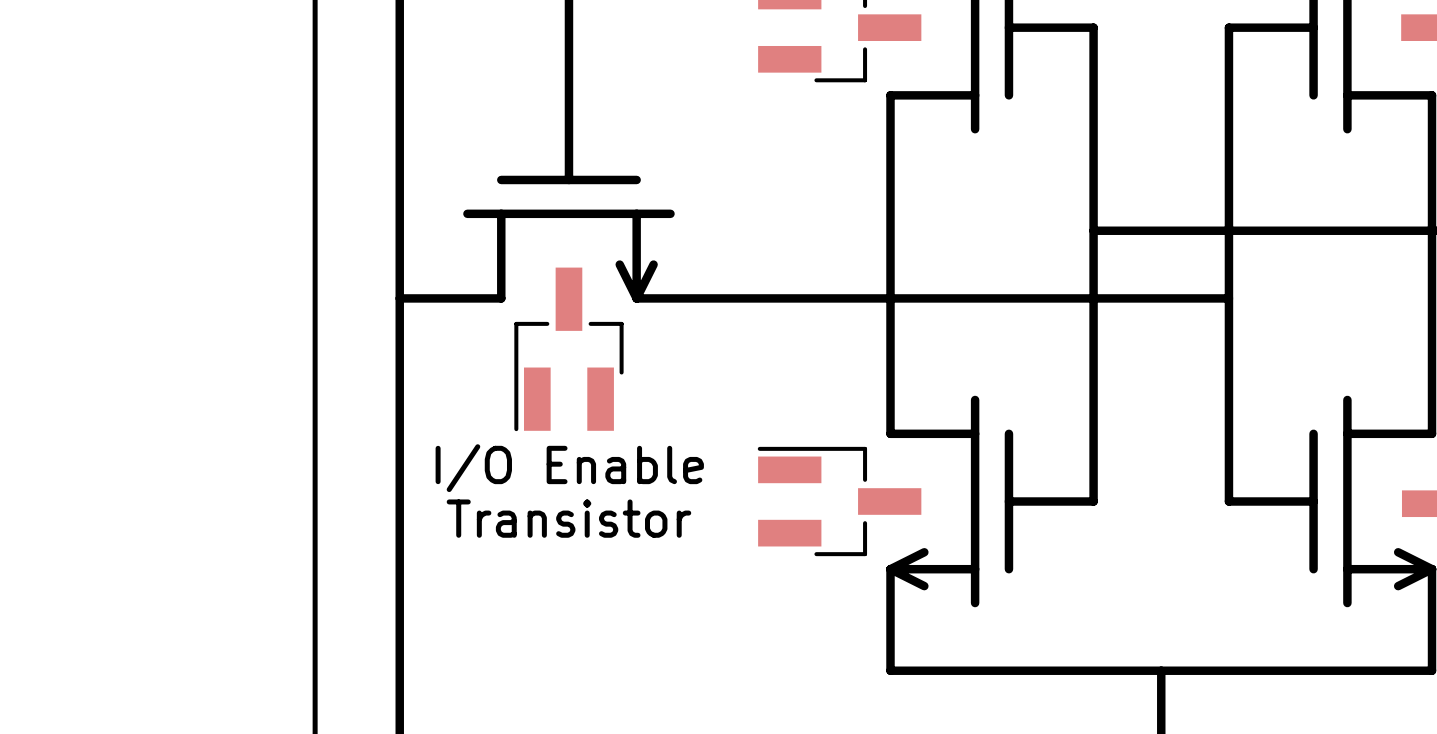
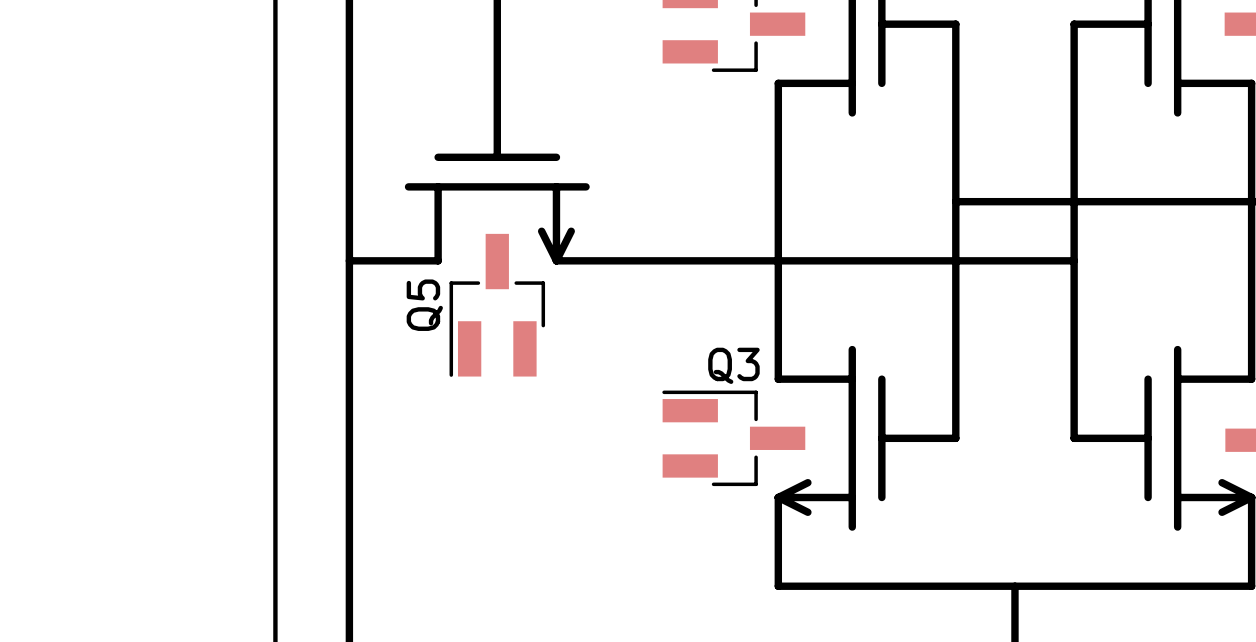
Q5 name: none -> Q5 (424, 305)
Q3 name: none -> Q3 (733, 365)
text: I/O Enable (569, 468) -> none
text: Transistor (568, 518) -> none

